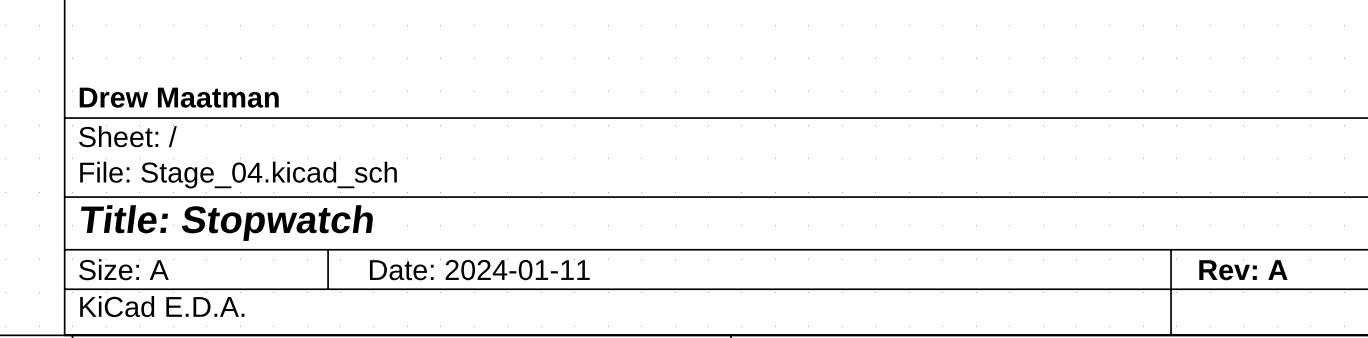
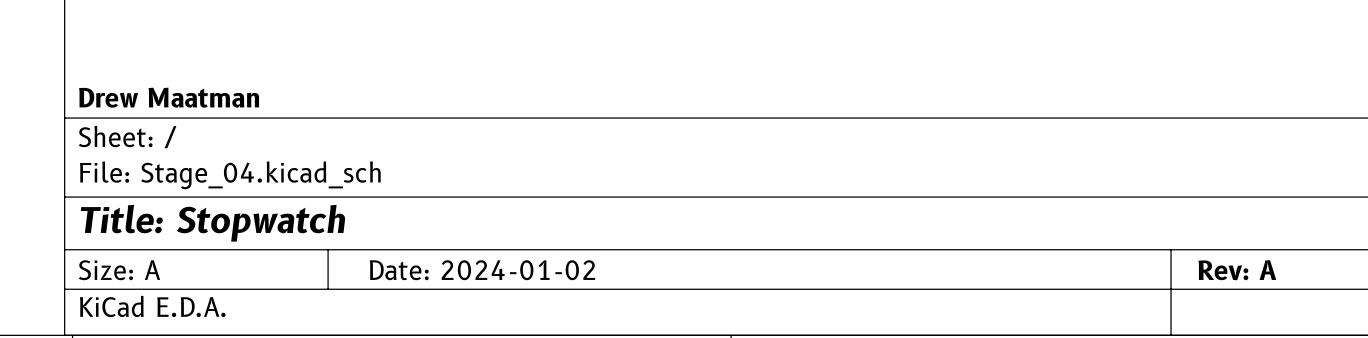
title block: Date: 2024-01-11 (479, 270) -> Date: 2024-01-02 (482, 270)

